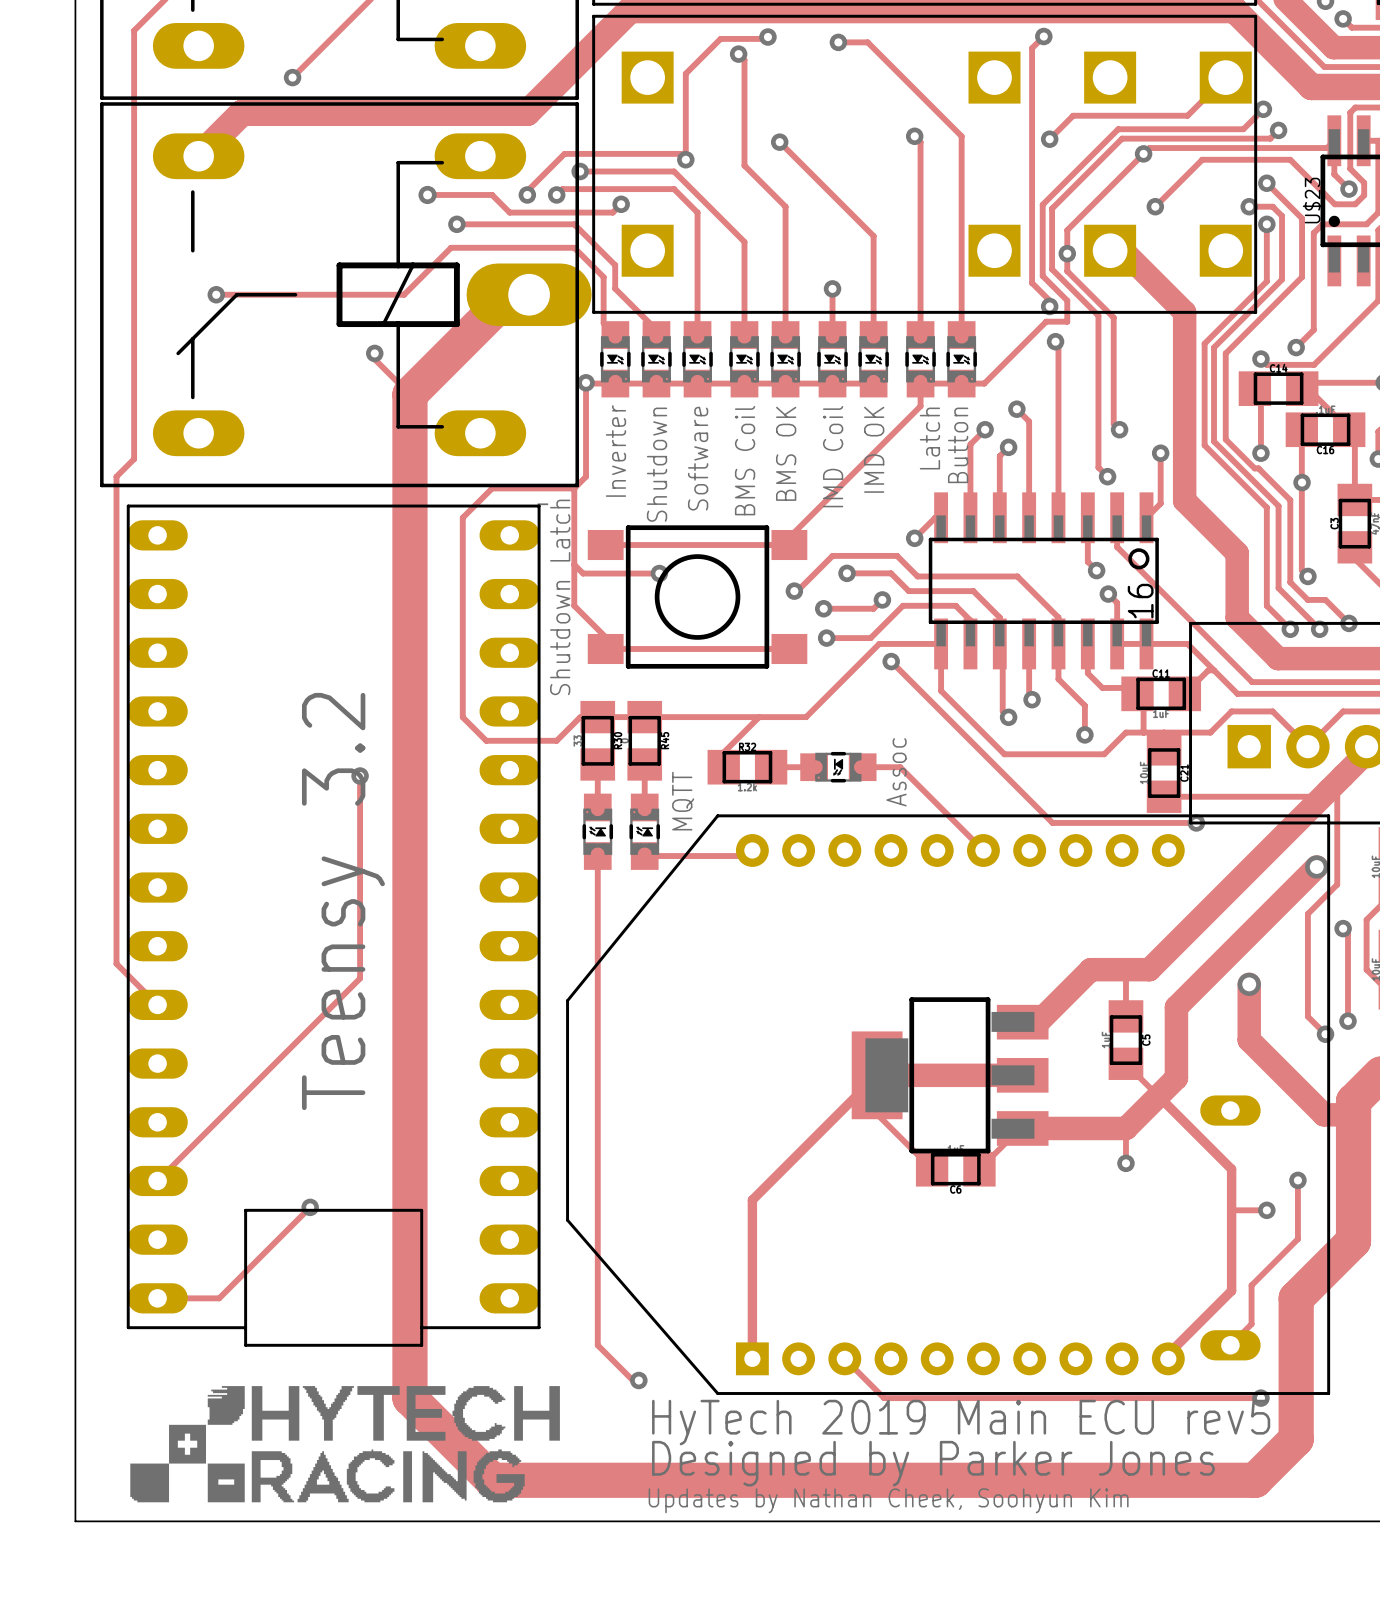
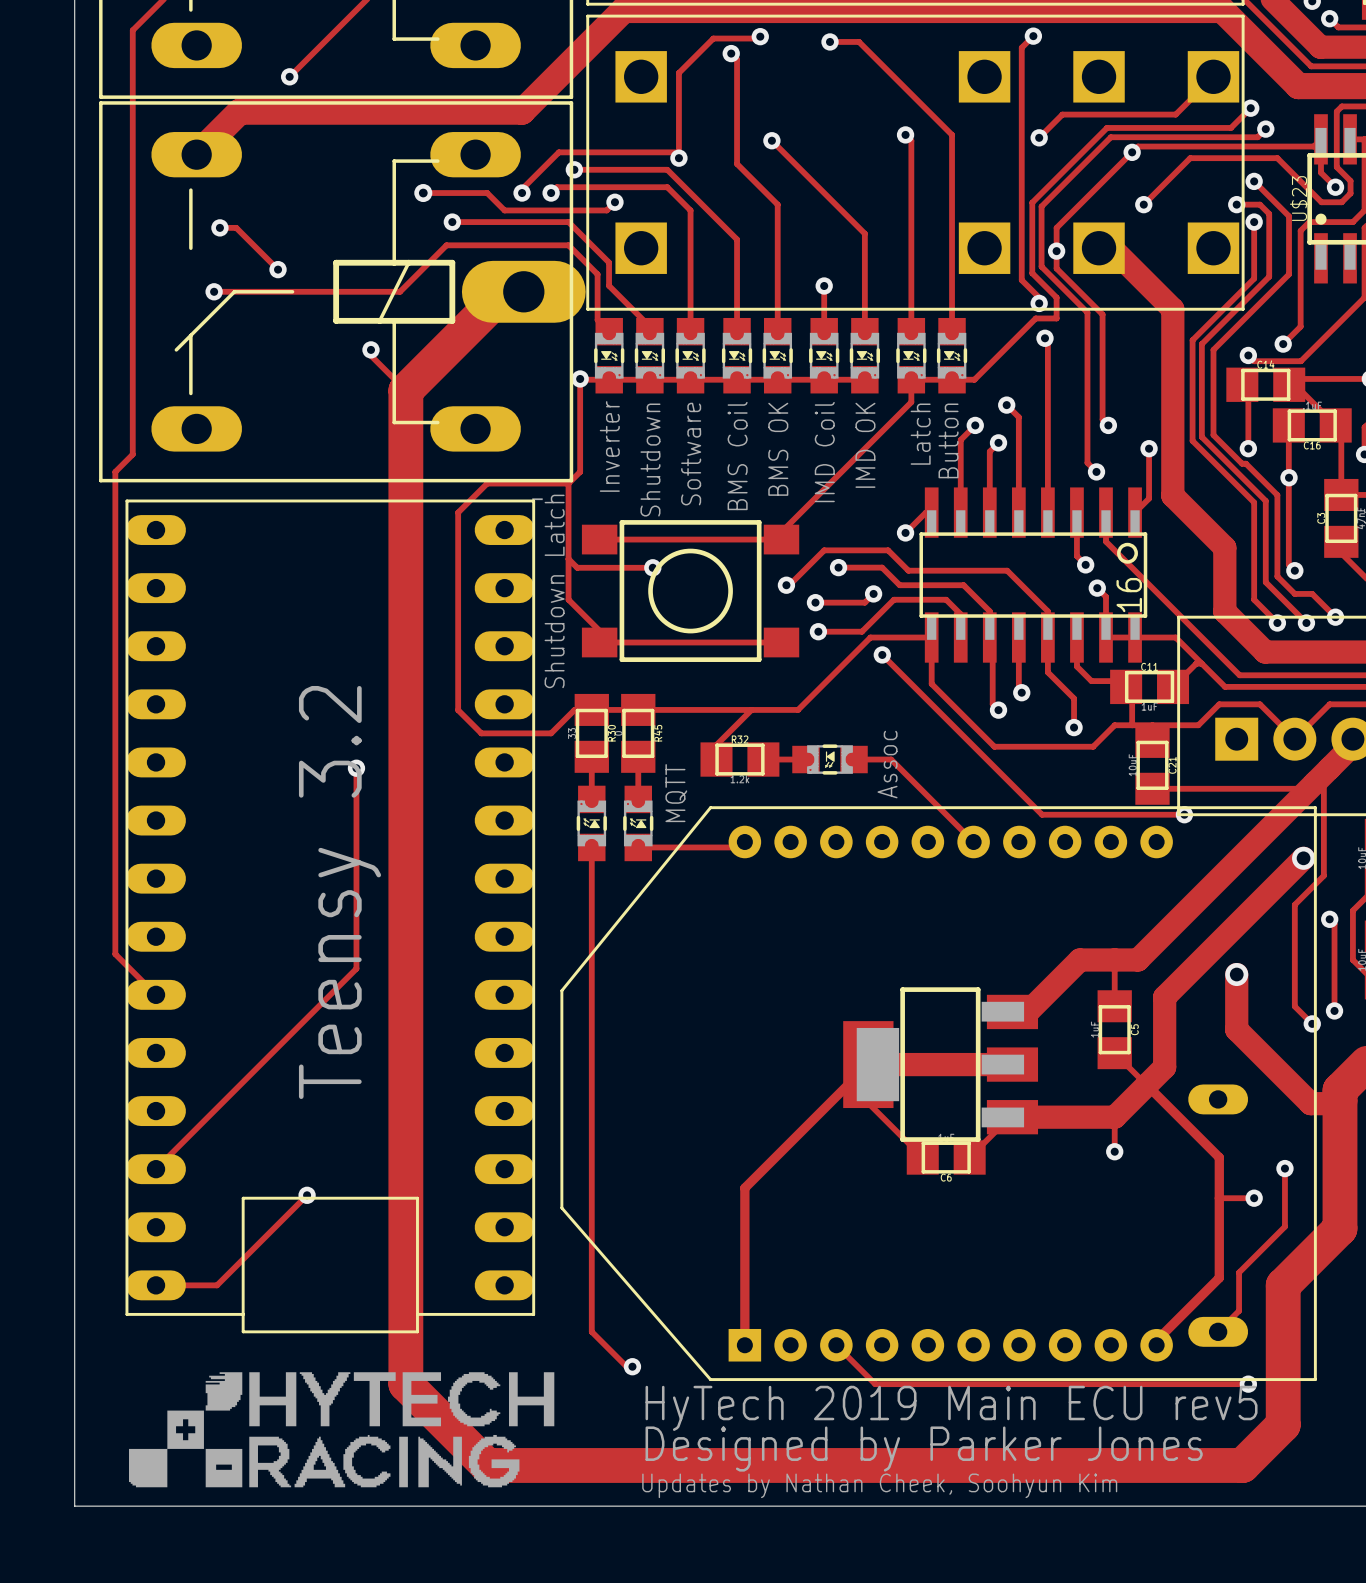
track: none -> (219, 227) (236, 227) (278, 269)
via: none -> (219, 227)
via: none -> (278, 269)

